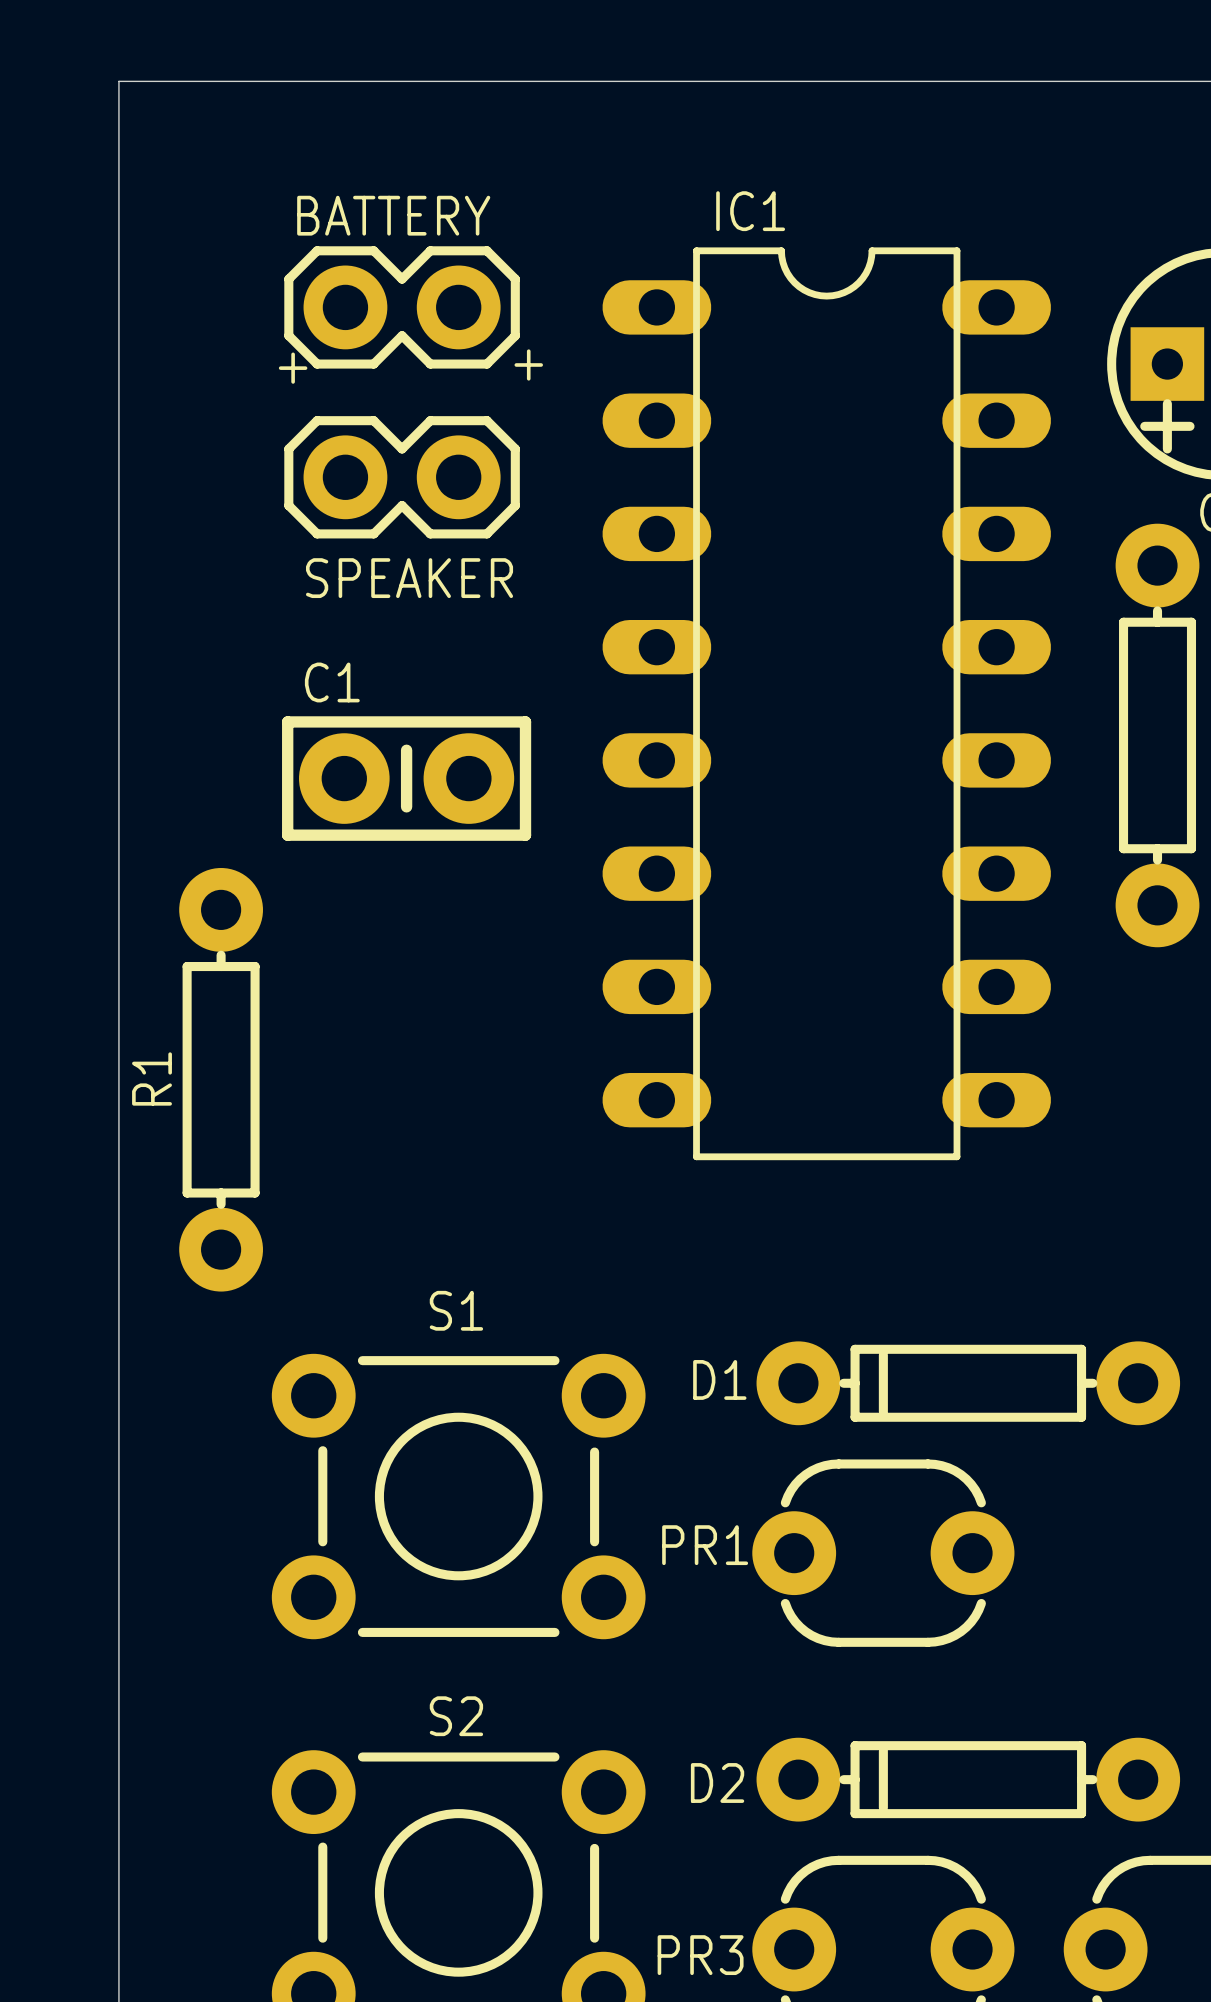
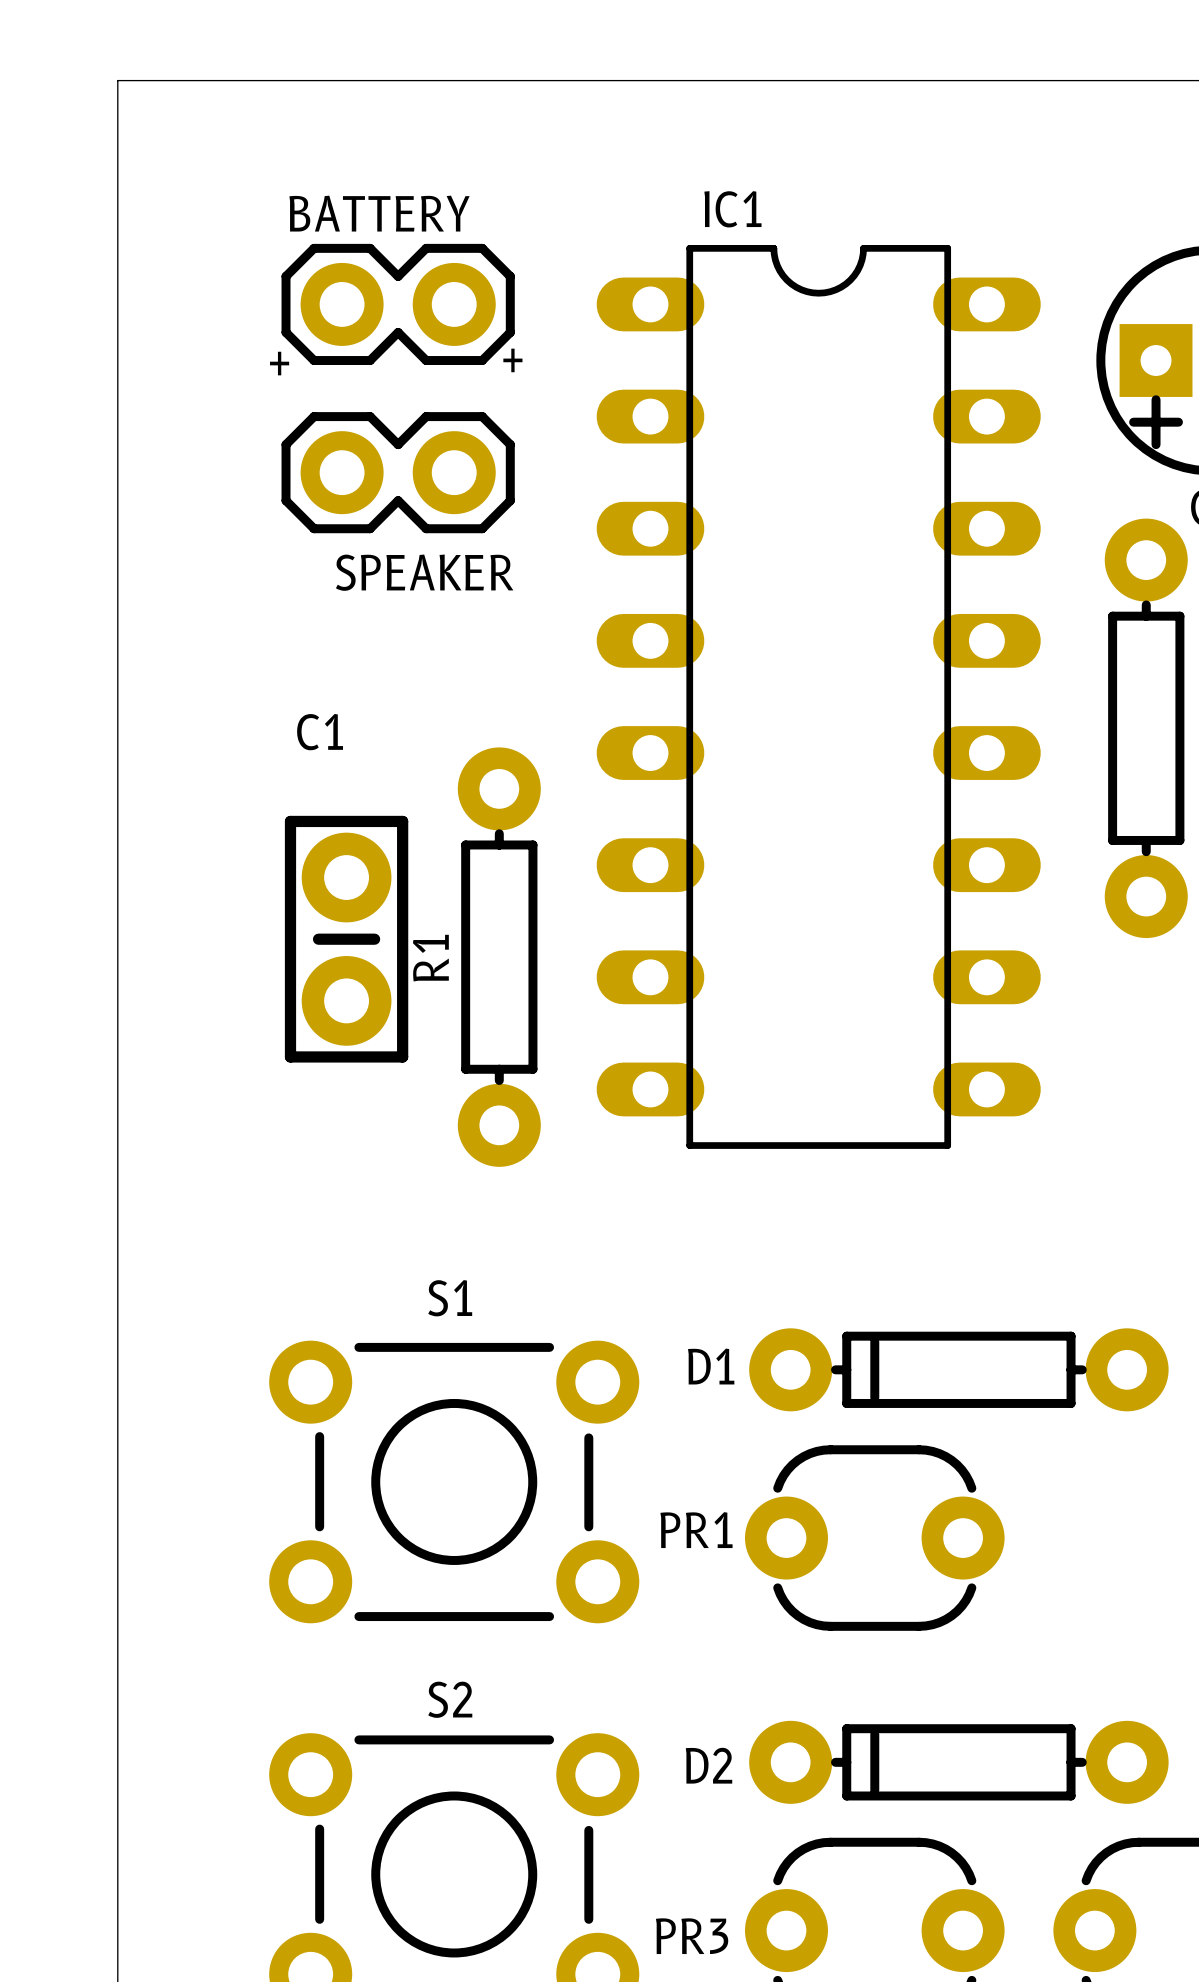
text position: C1 (332, 682) -> C1 (320, 732)
part rotation: 0° (406, 778) -> 90° clockwise (346, 939)
part position: (406, 778) -> (346, 939)
R1 position: (221, 1079) -> (499, 957)

